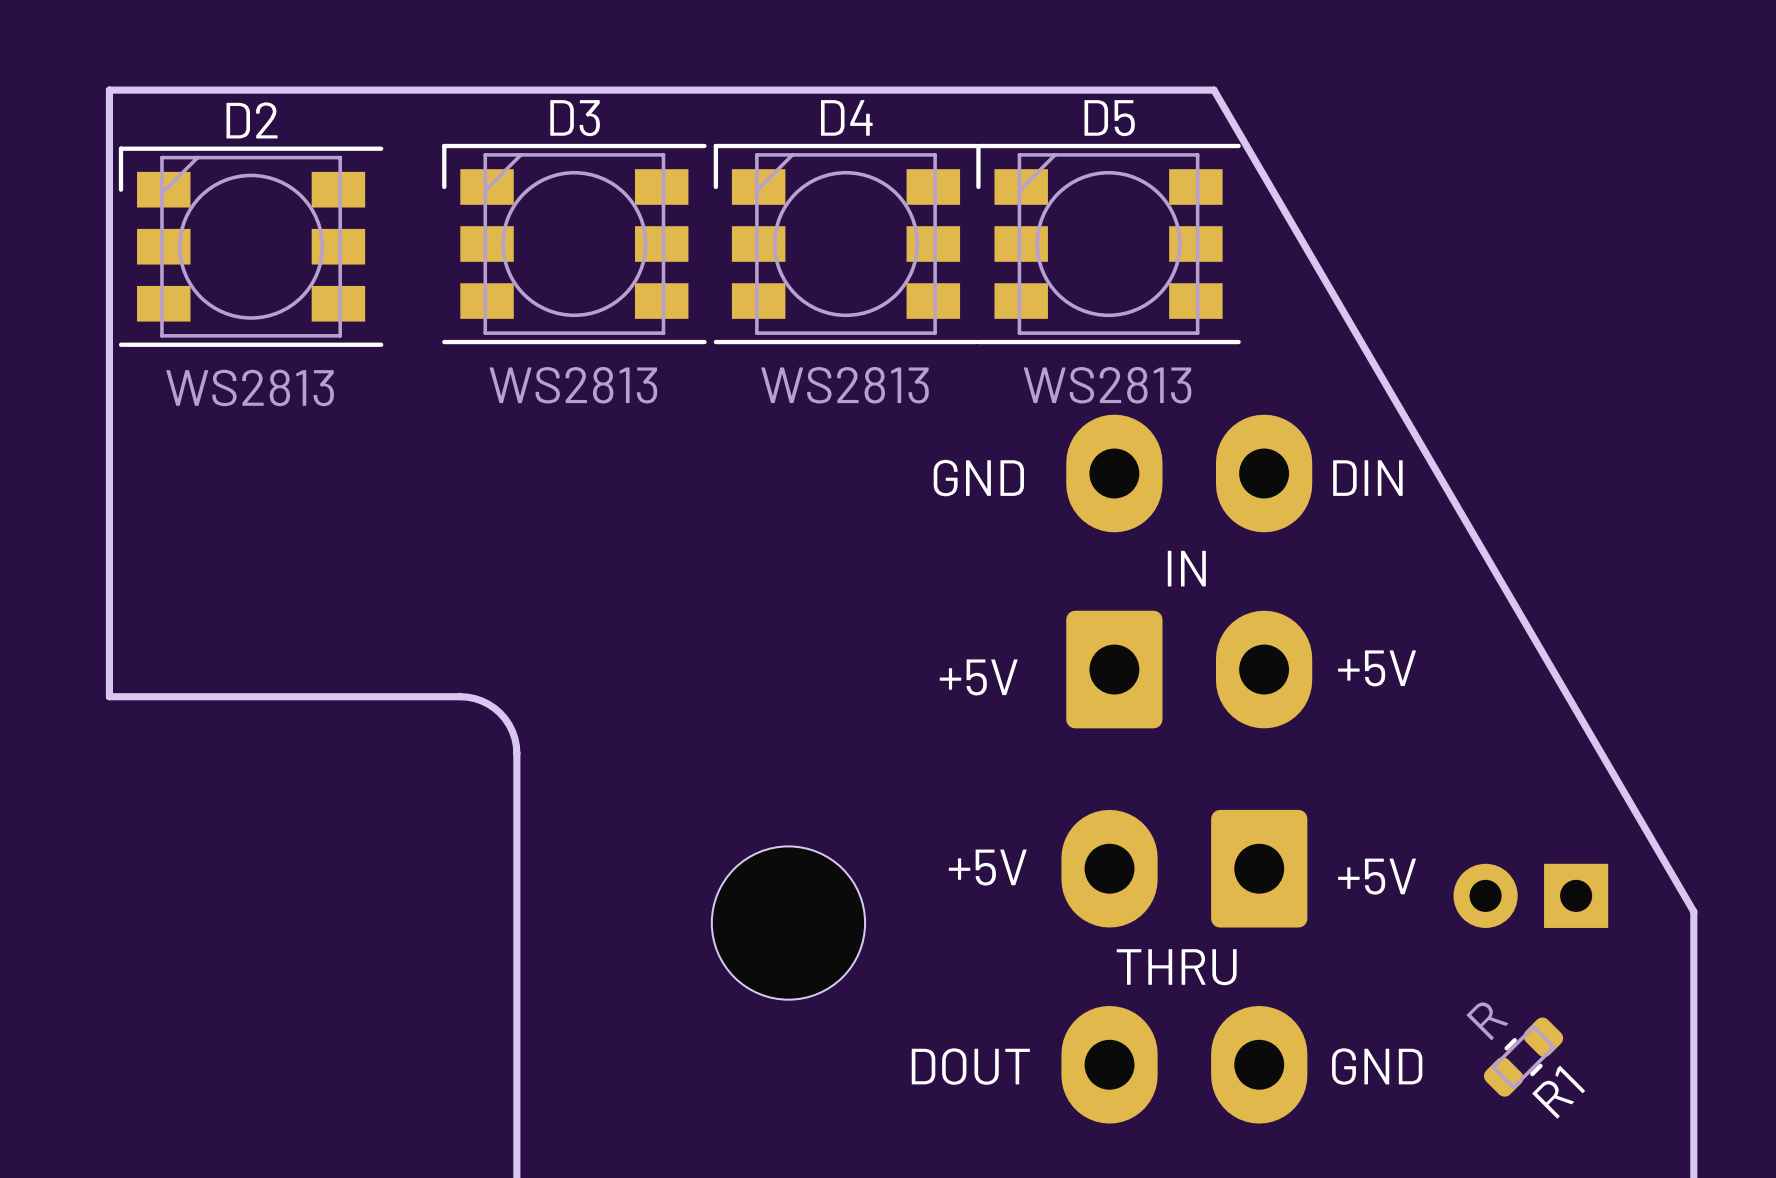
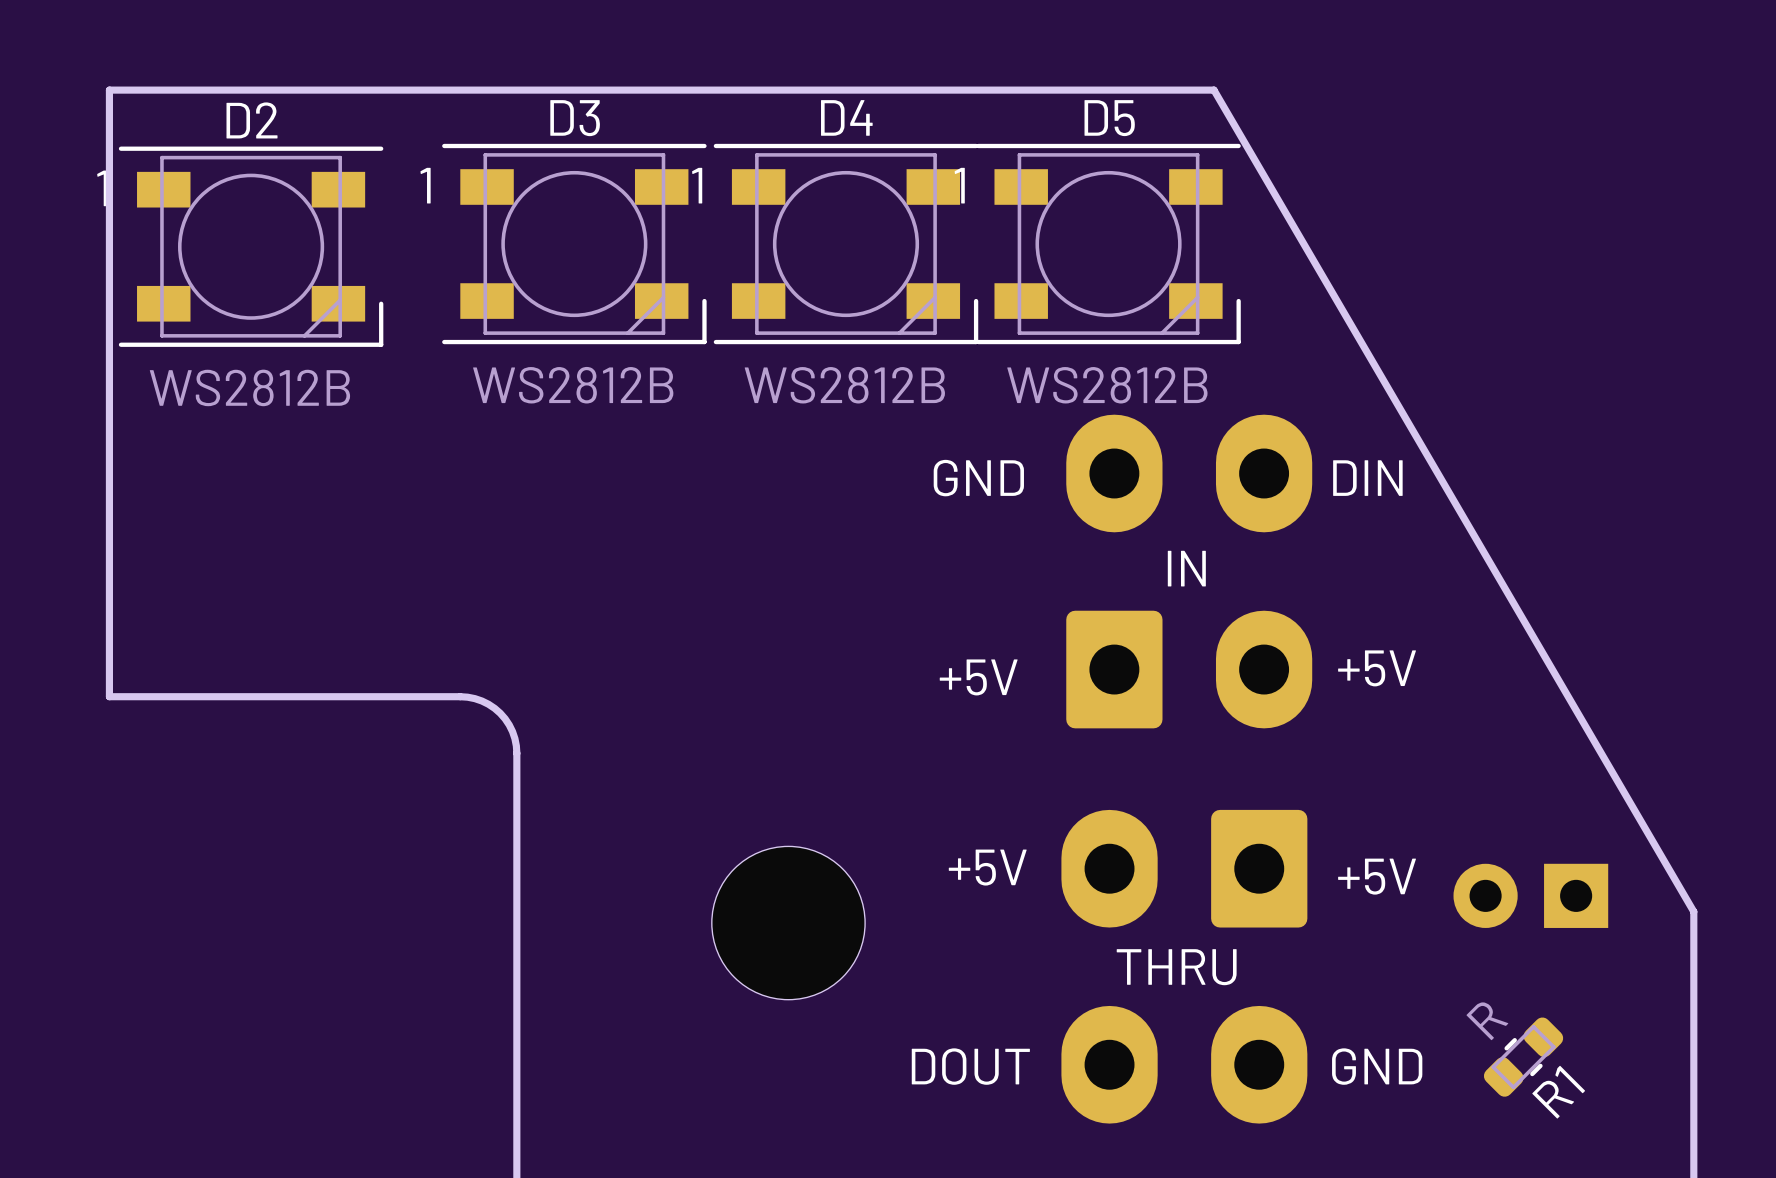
D3 footprint: [442, 143, 707, 345] -> [442, 143, 707, 345]
D4 footprint: [713, 143, 979, 345] -> [713, 143, 979, 345]
D5 footprint: [976, 143, 1241, 345] -> [976, 143, 1241, 345]
D2 footprint: [118, 146, 384, 347] -> [118, 146, 384, 347]
D3 value: WS2813 (573, 385) -> WS2812B (573, 385)
D4 value: WS2813 (845, 385) -> WS2812B (844, 385)
D5 value: WS2813 (1107, 385) -> WS2812B (1107, 385)
D2 value: WS2813 (250, 387) -> WS2812B (249, 387)

